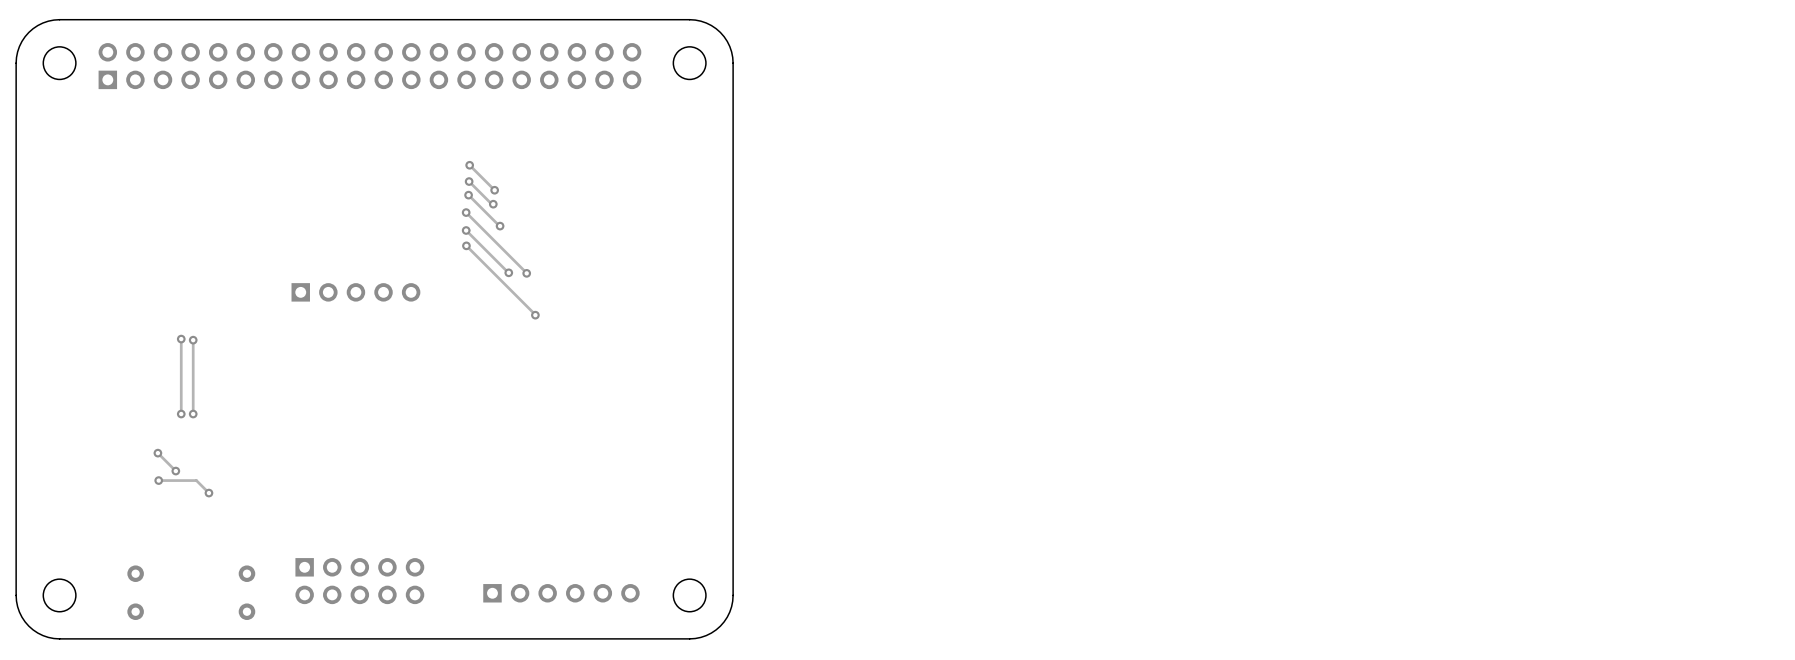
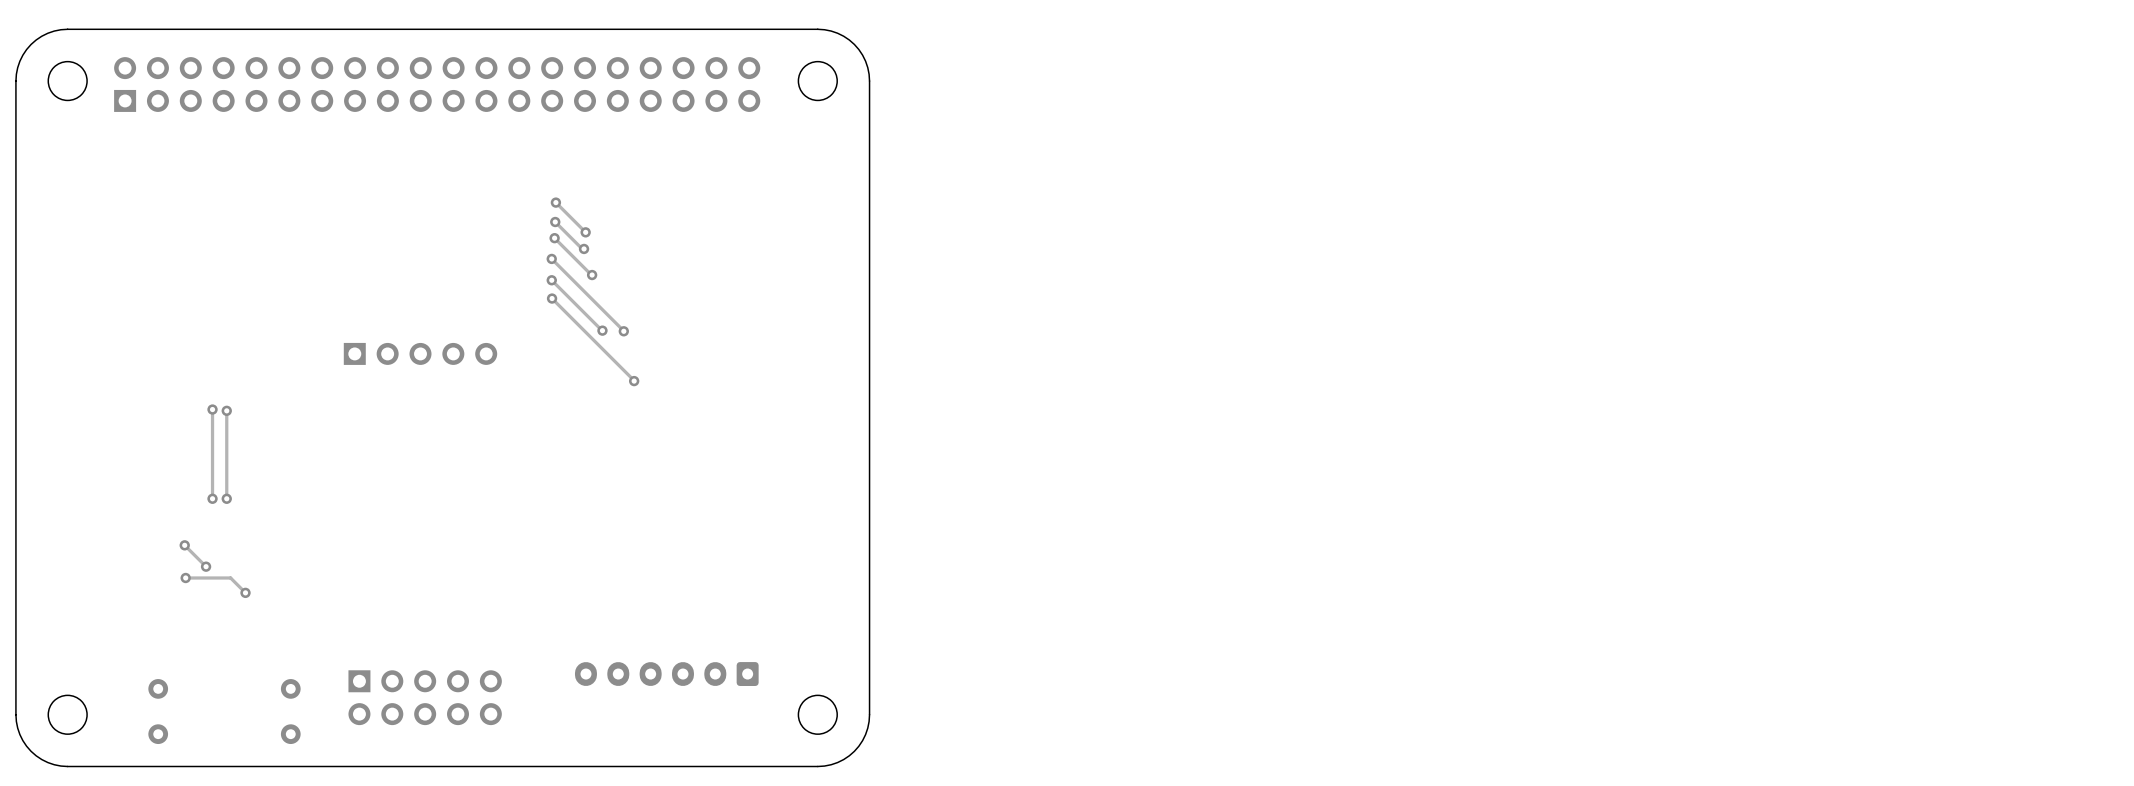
part: none -> (666, 674)
part: (561, 593) -> none

